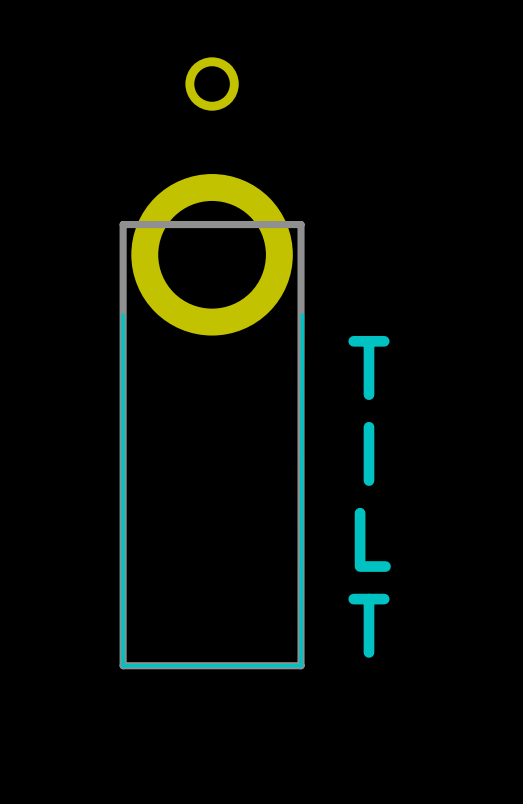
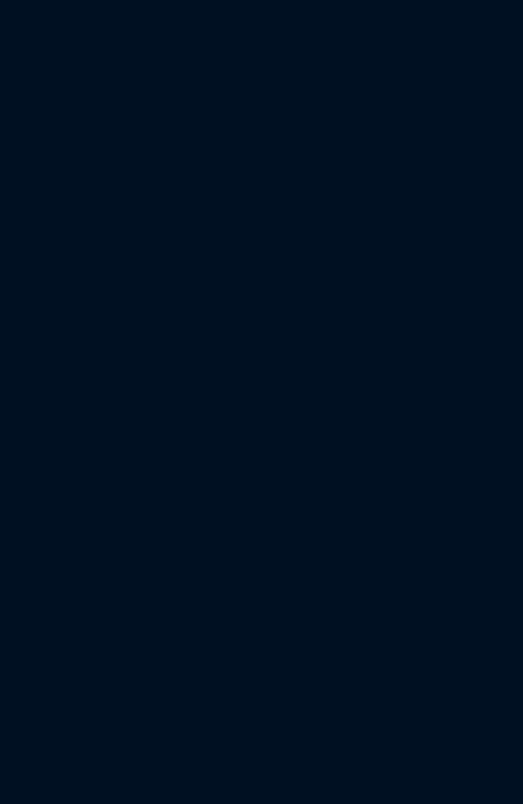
part: (212, 363) -> none
text: T (368, 367) -> none
text: I (368, 453) -> none
text: L (372, 539) -> none
text: T (368, 625) -> none

